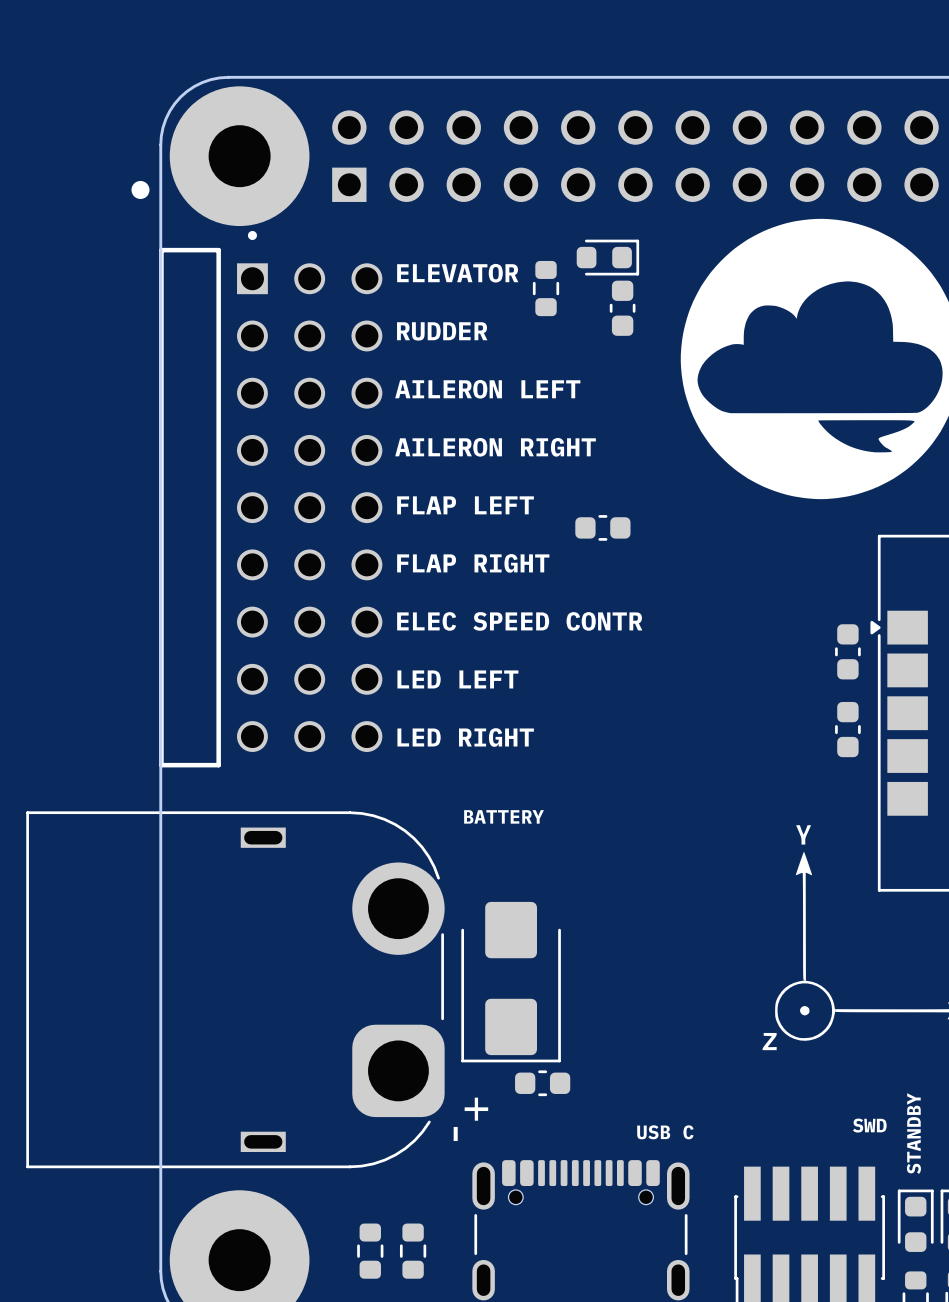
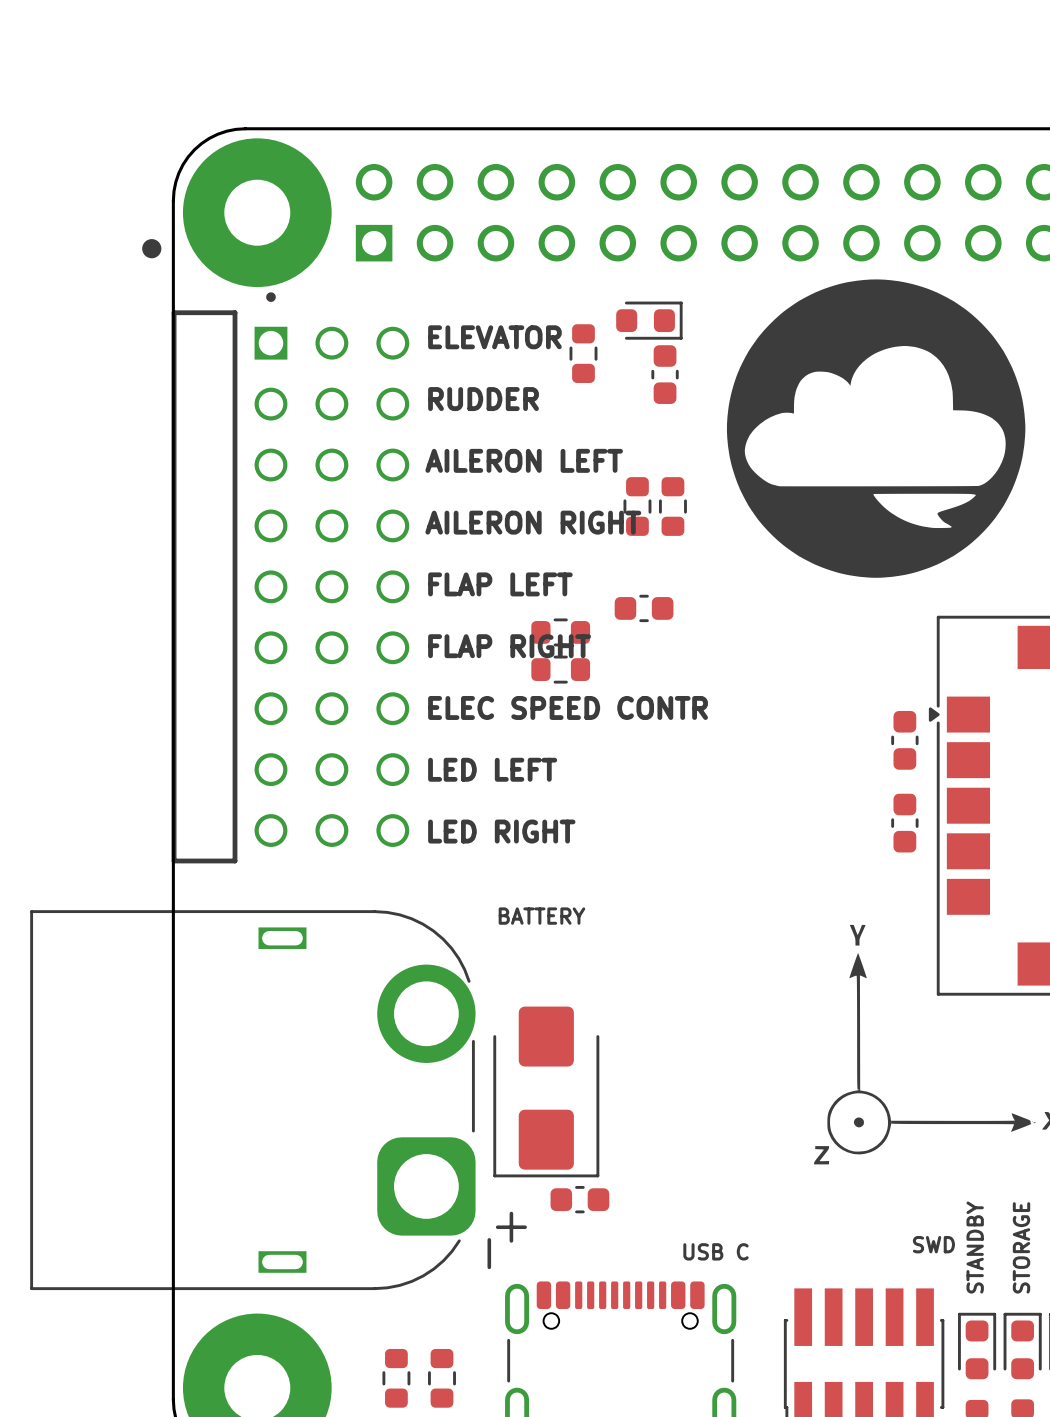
part: none -> (637, 506)
part: none -> (672, 506)
part: none -> (560, 632)
part: none -> (560, 669)

